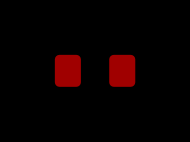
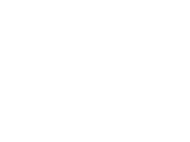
part: (95, 70) -> none

